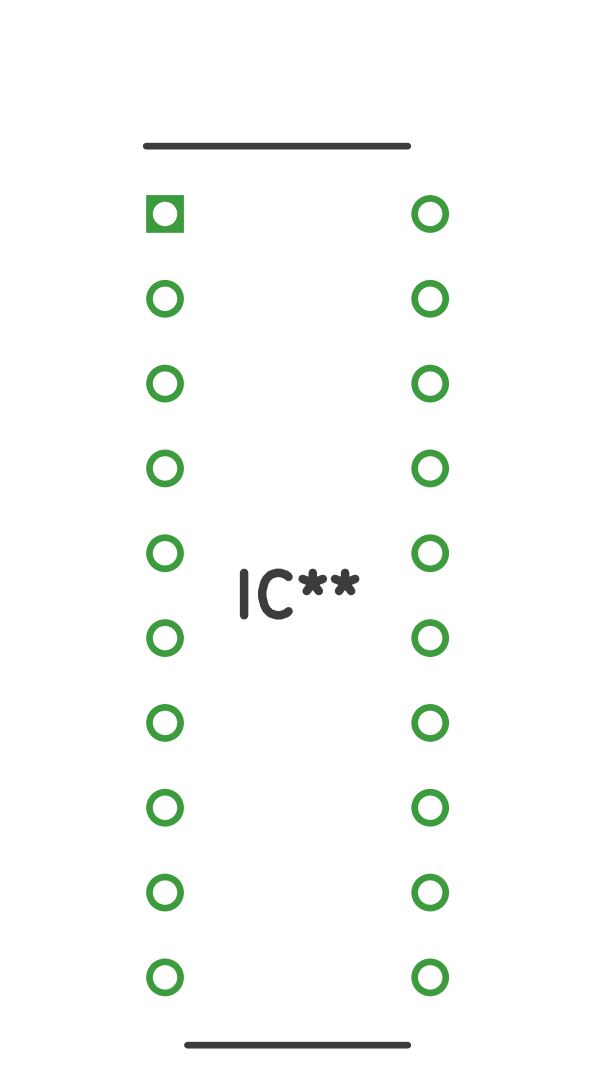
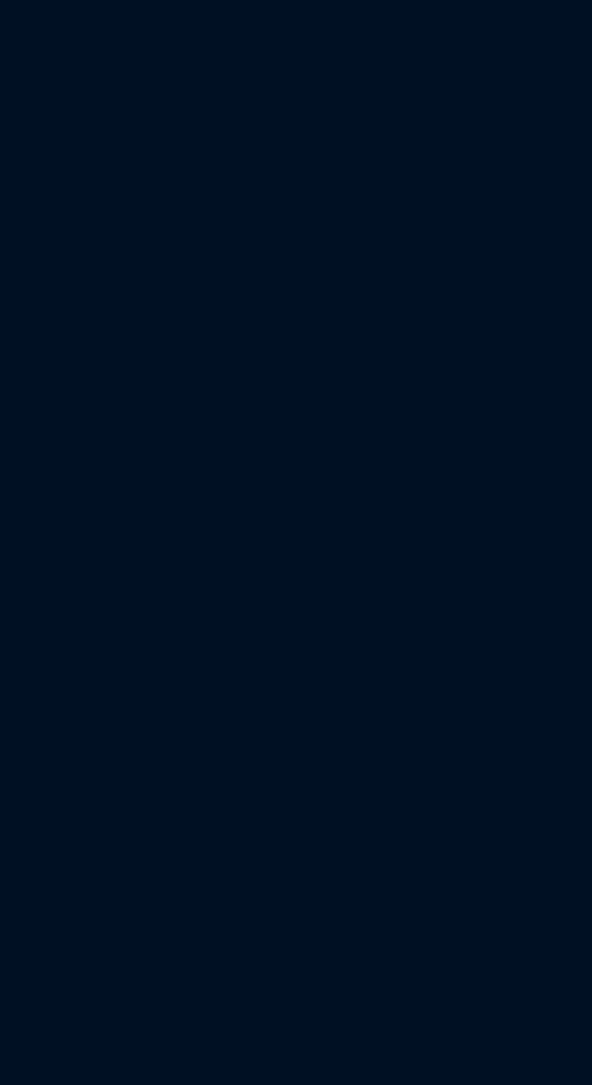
IC**: (295, 595) -> none

